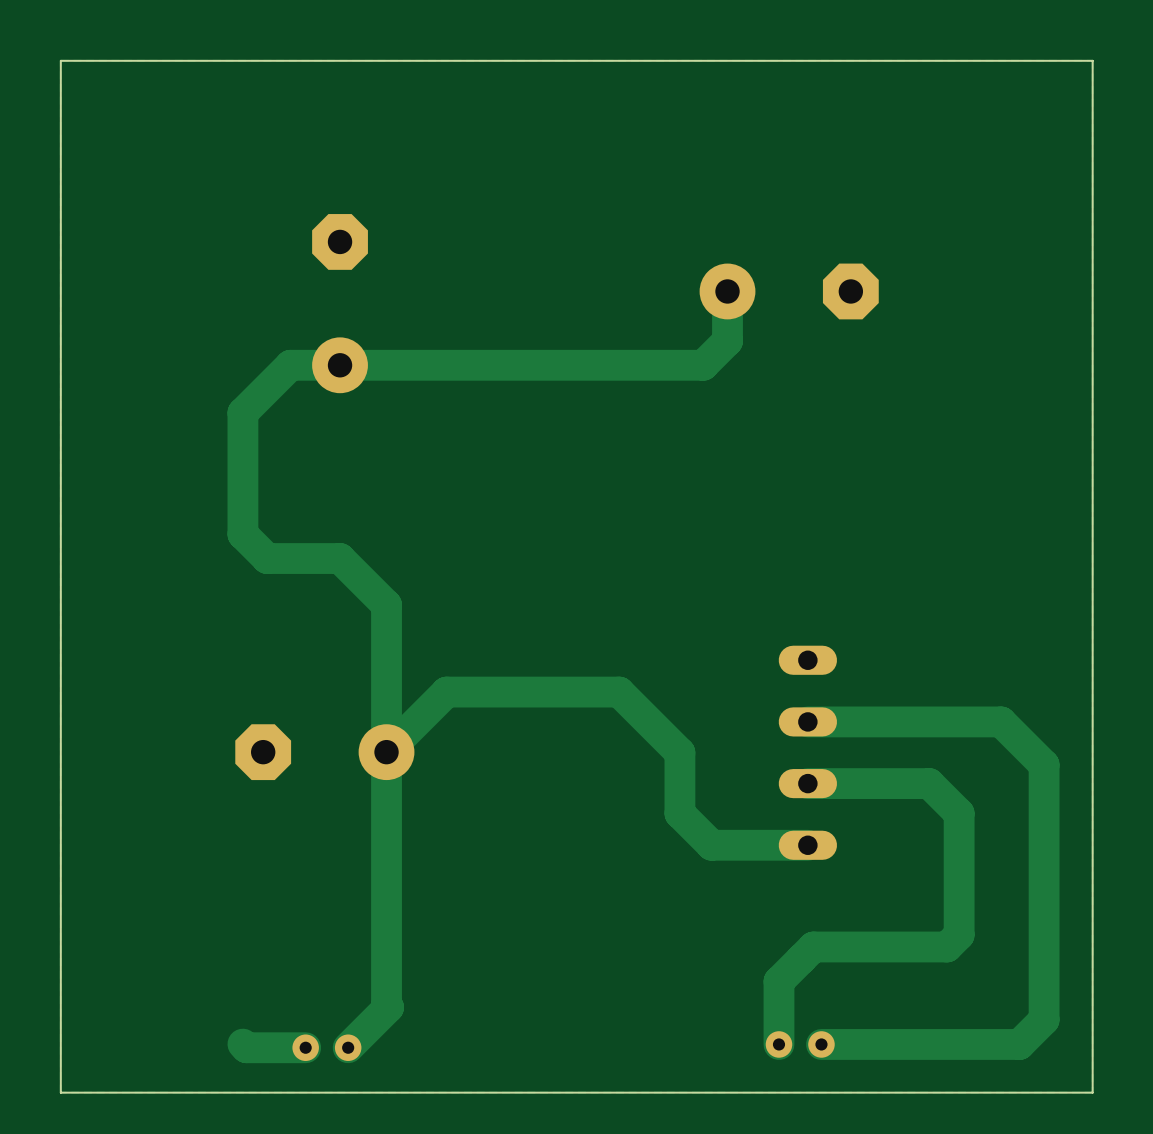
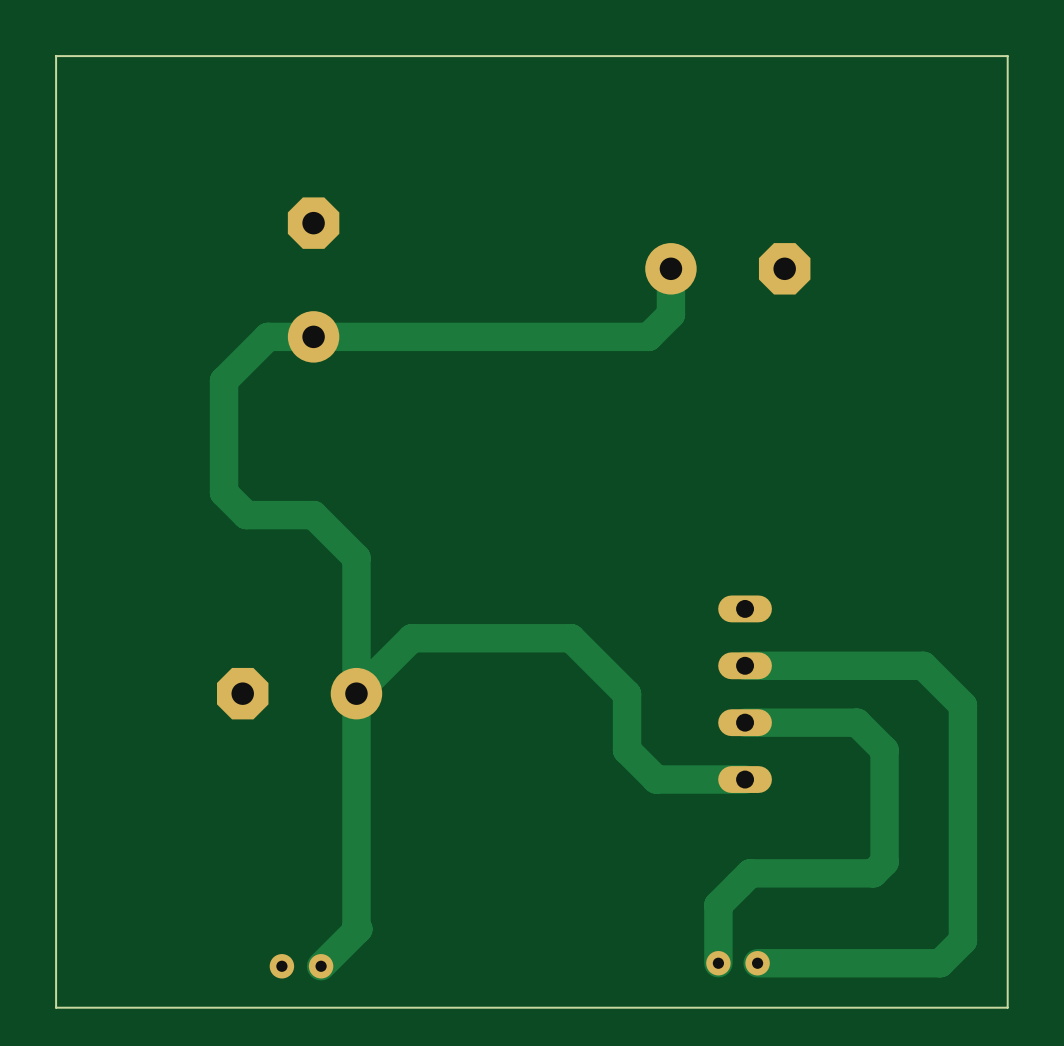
track: (242, 1044) (246, 1047) (305, 1047) -> none

